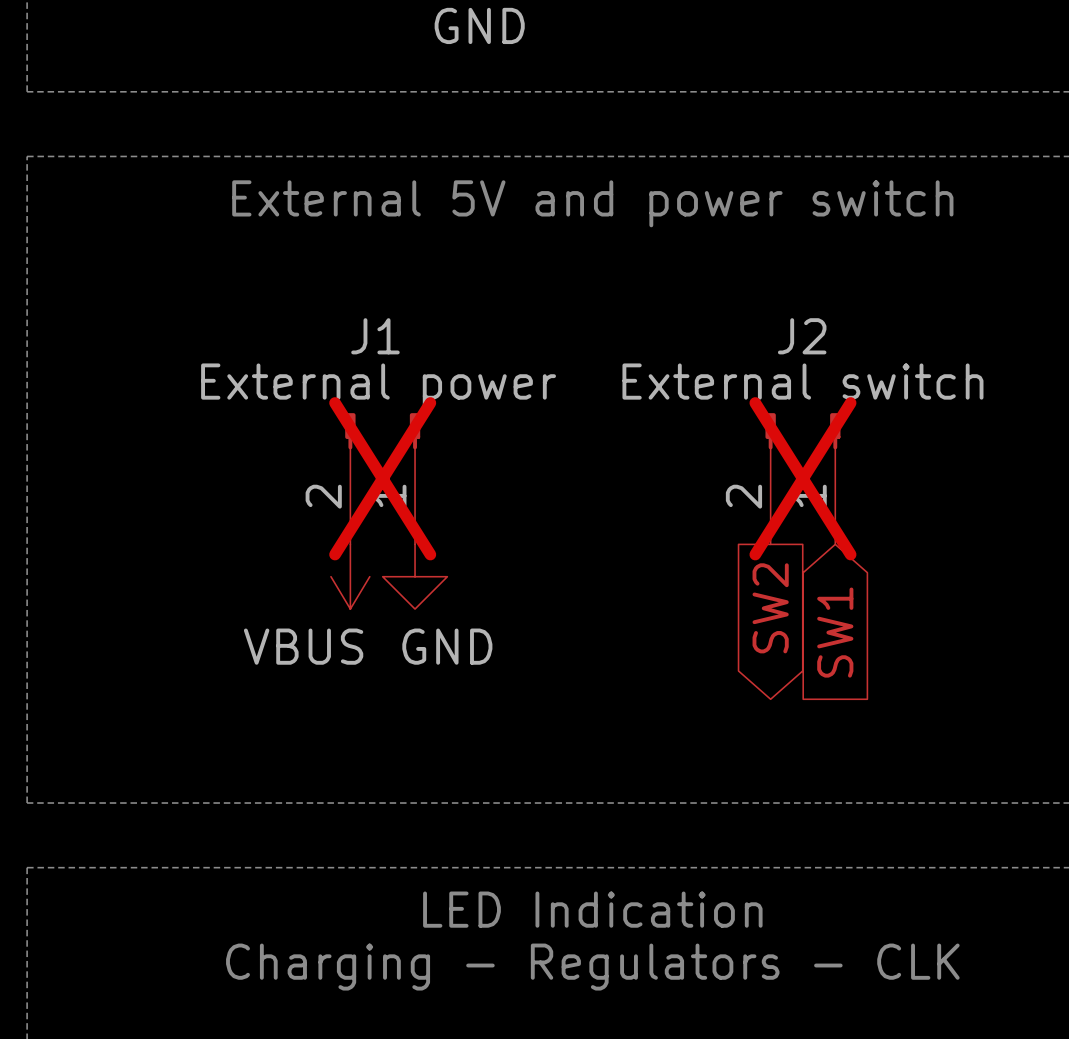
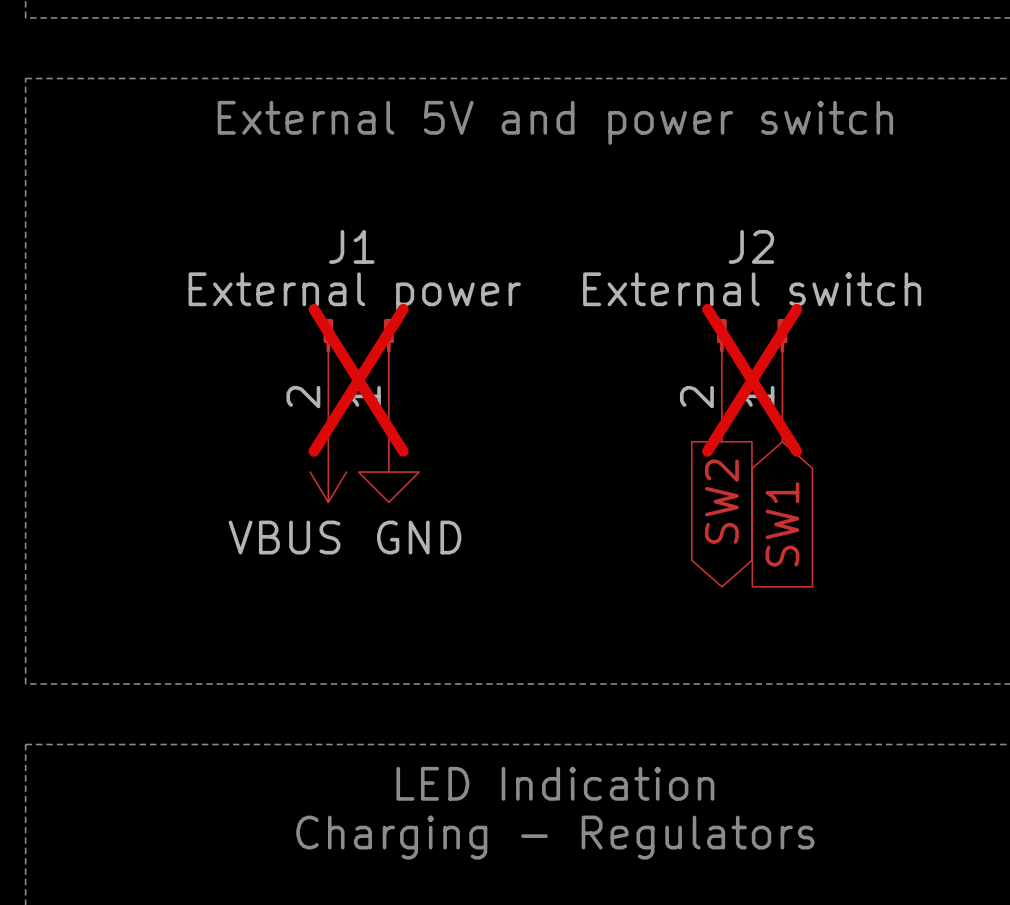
text: Charging - Regulators - CLK (592, 967) -> Charging - Regulators (555, 837)

